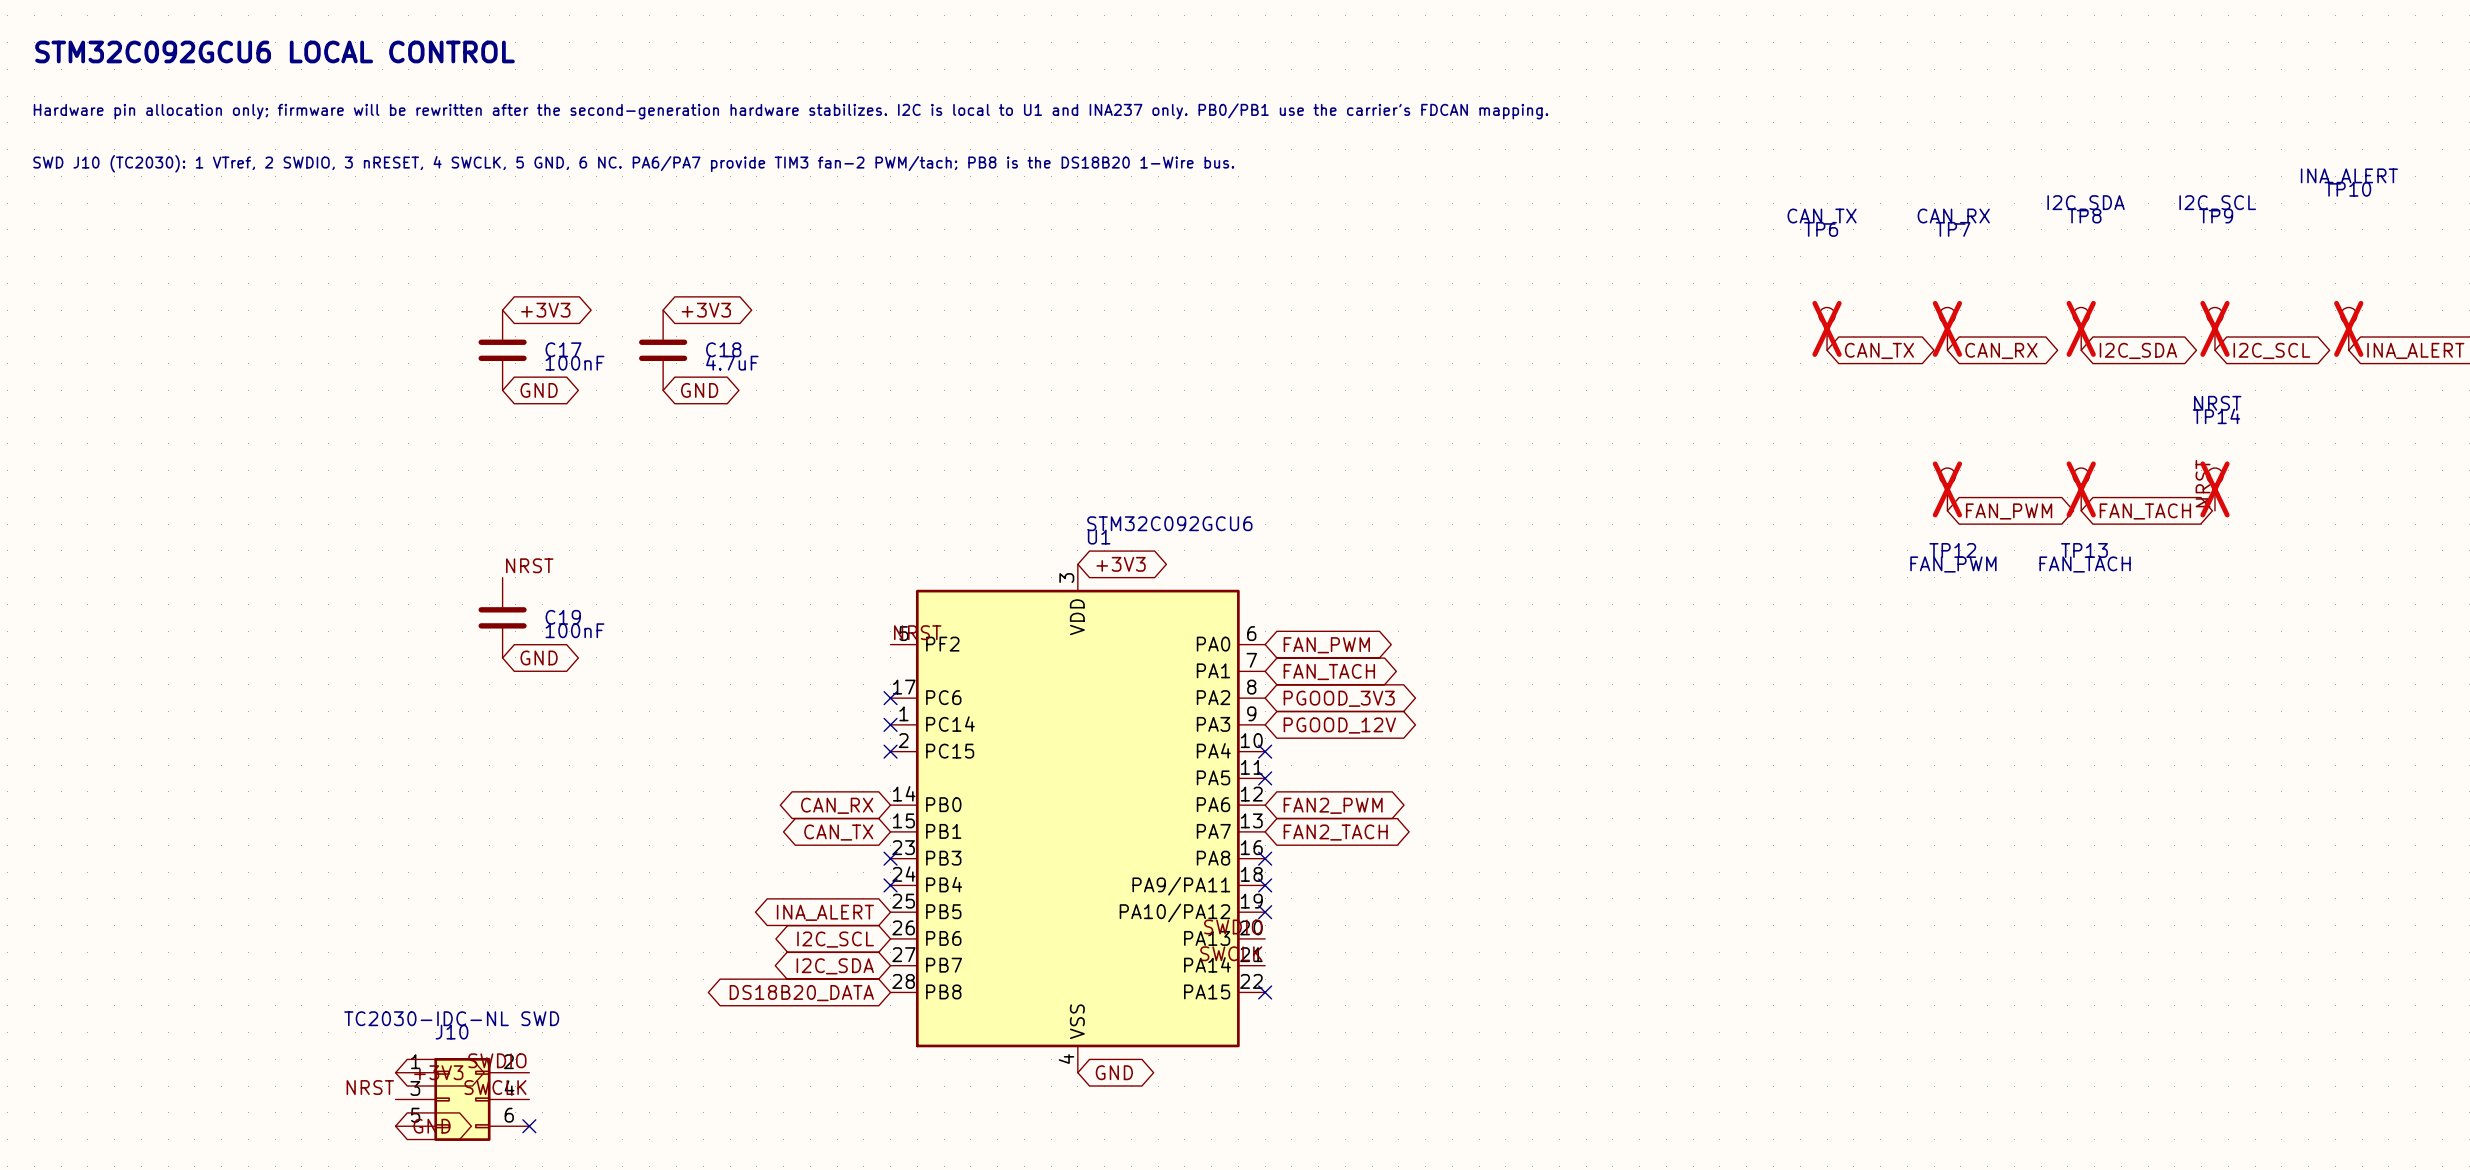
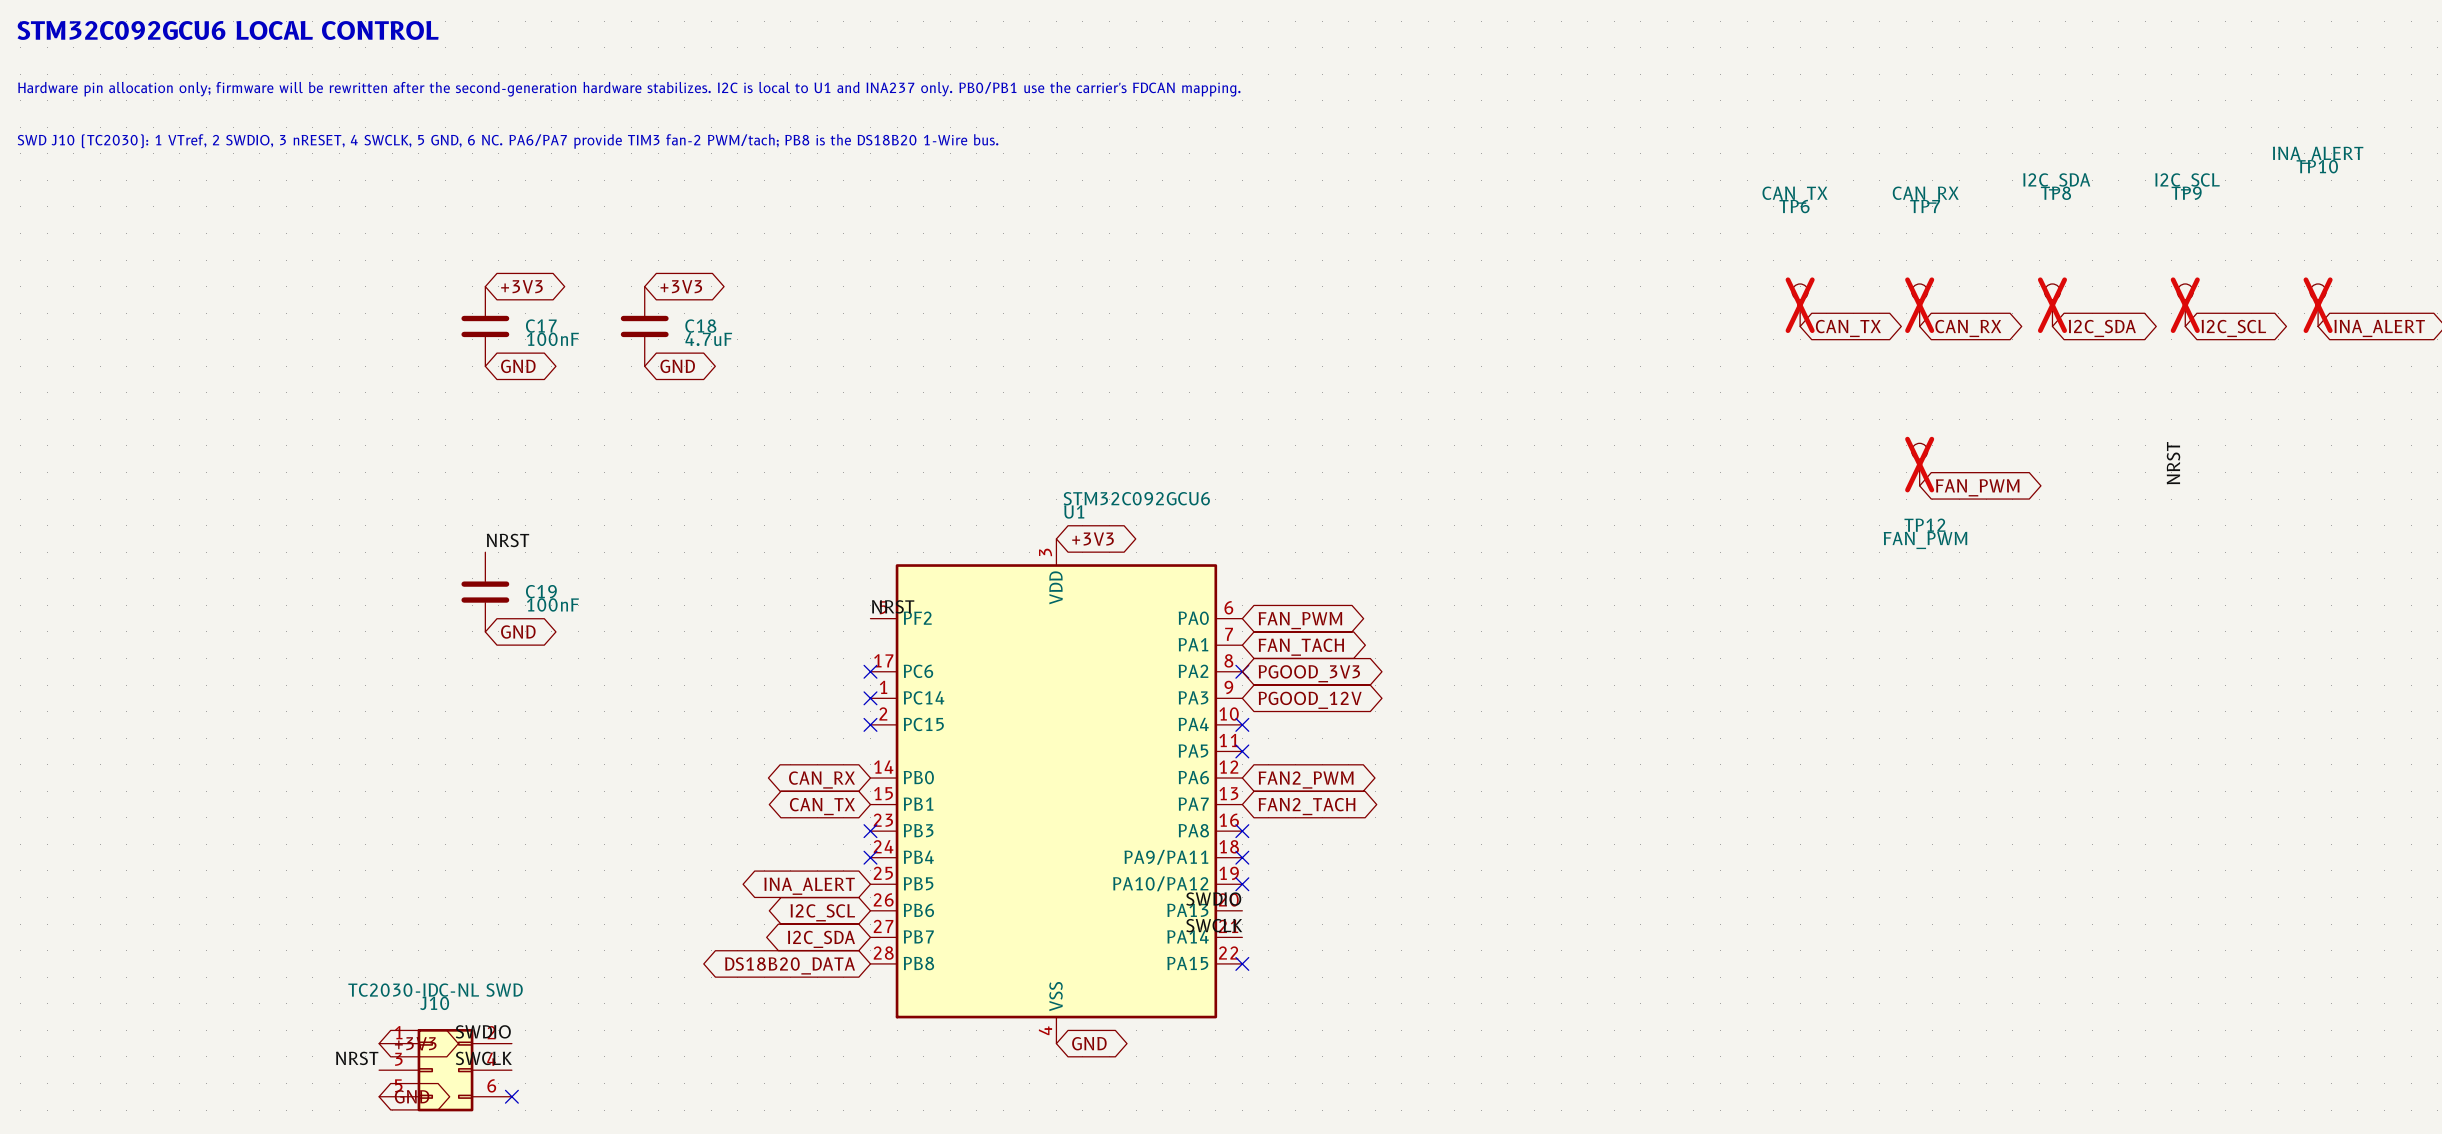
TP13: FAN_TACH (2081, 489) -> none
TP14: NRST (2214, 489) -> none
global label: FAN_TACH (2145, 511) -> none
no-connect mark: none -> (1242, 671)

